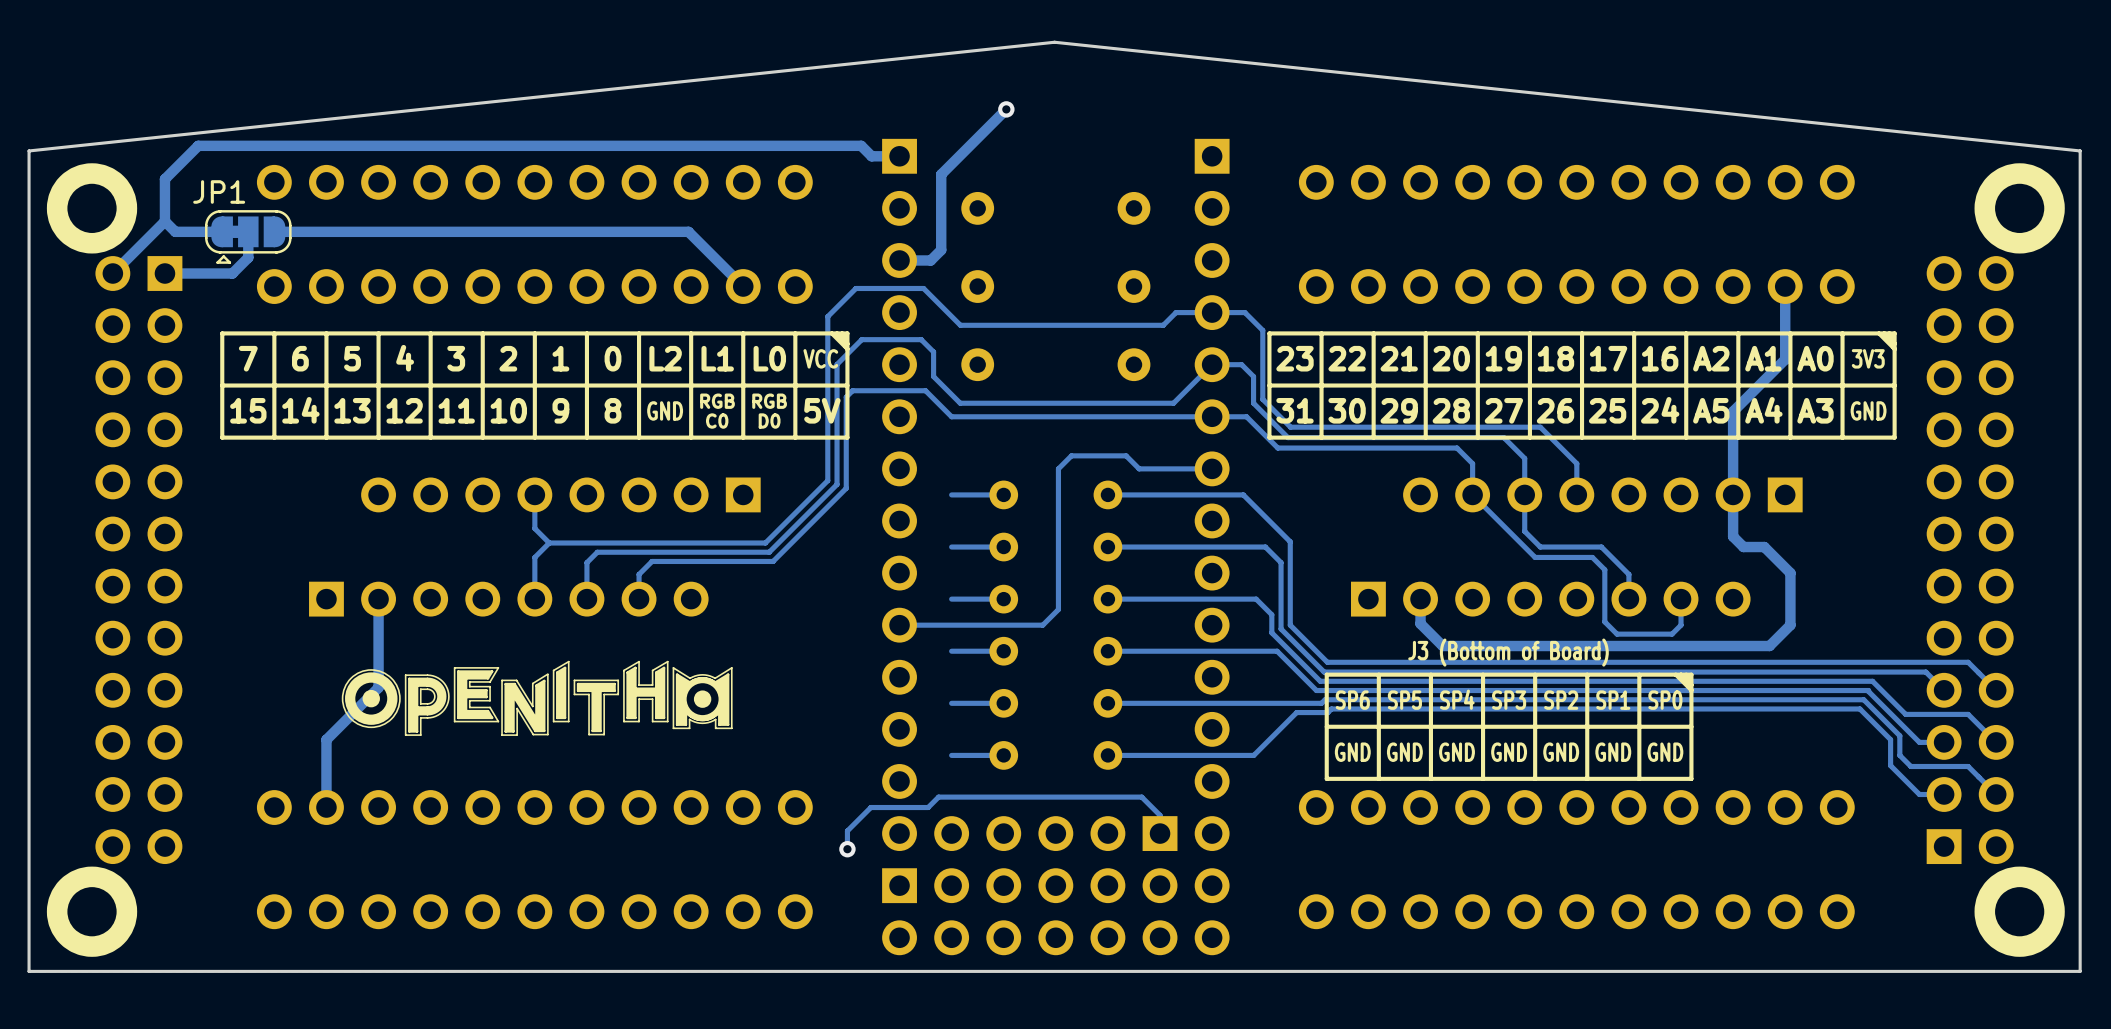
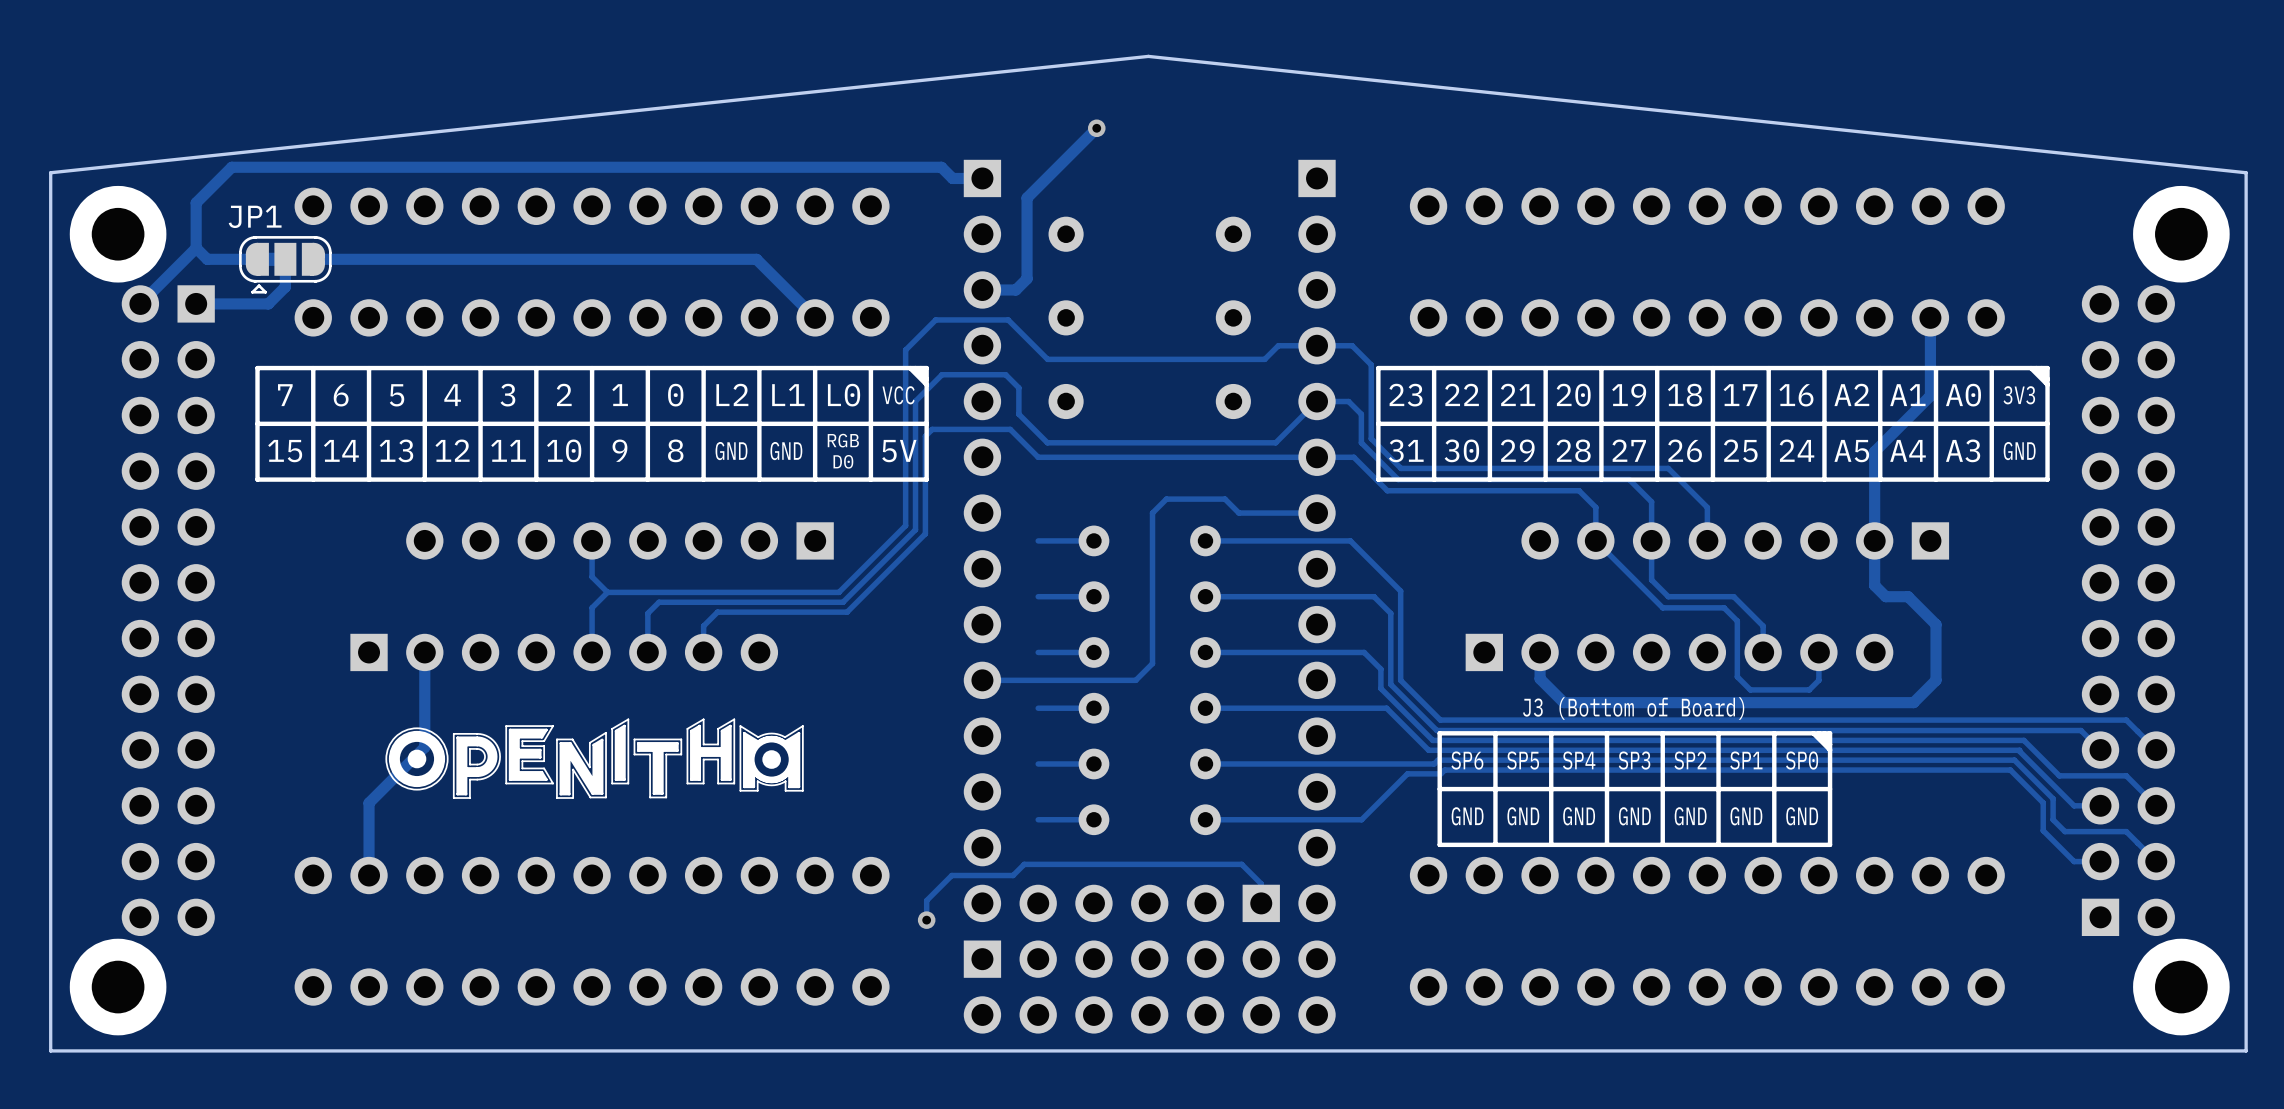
text: RGB (717, 401) -> none
text: none -> GND (786, 451)
text: C0 (717, 421) -> none

